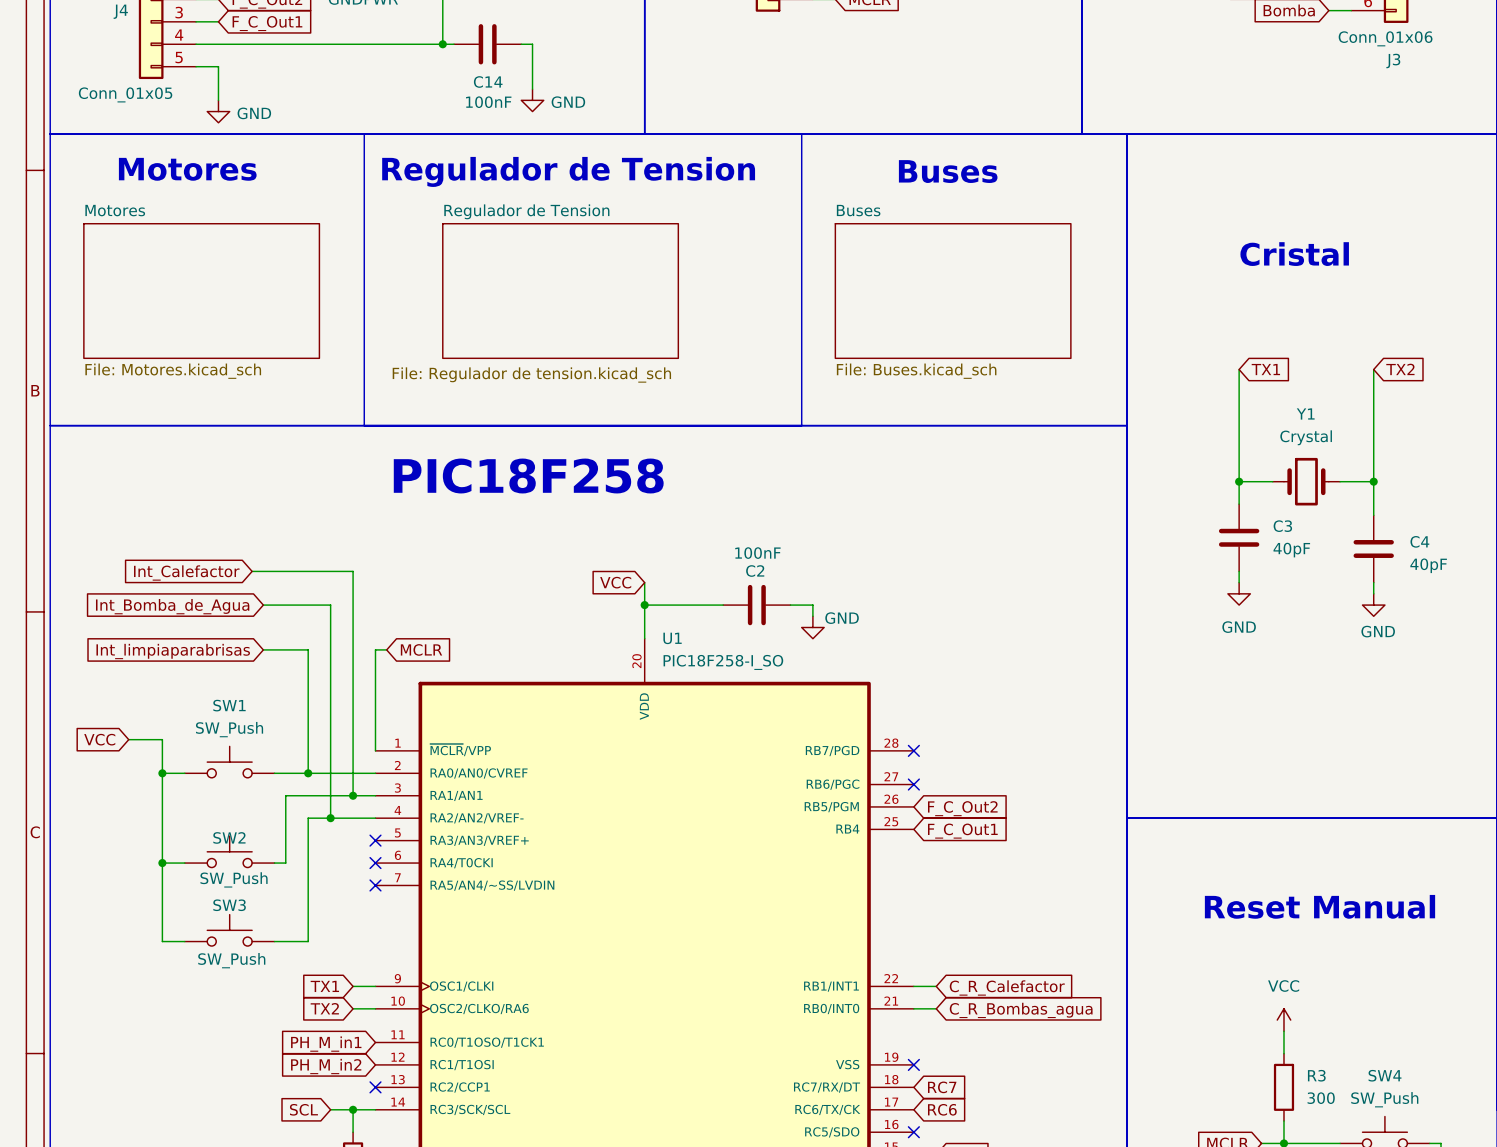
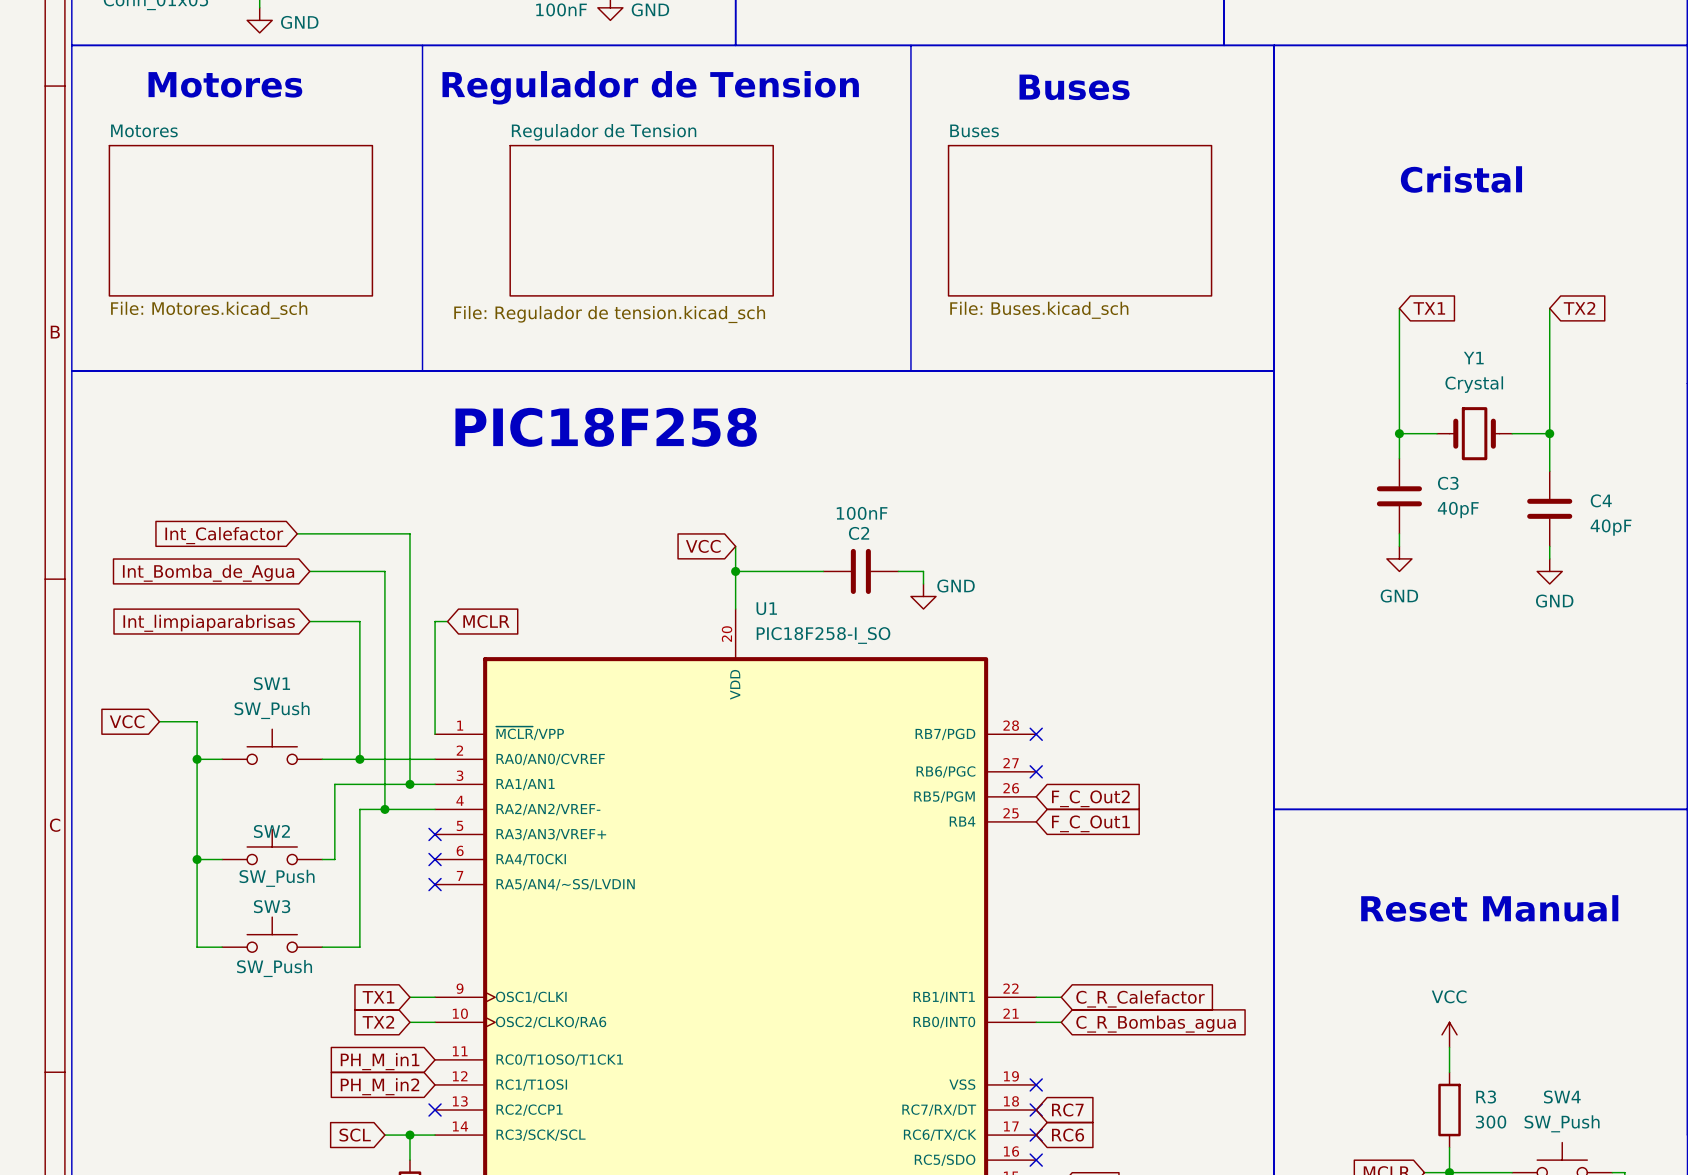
no-connect mark: none -> (1036, 1110)
no-connect mark: none -> (1036, 1135)

